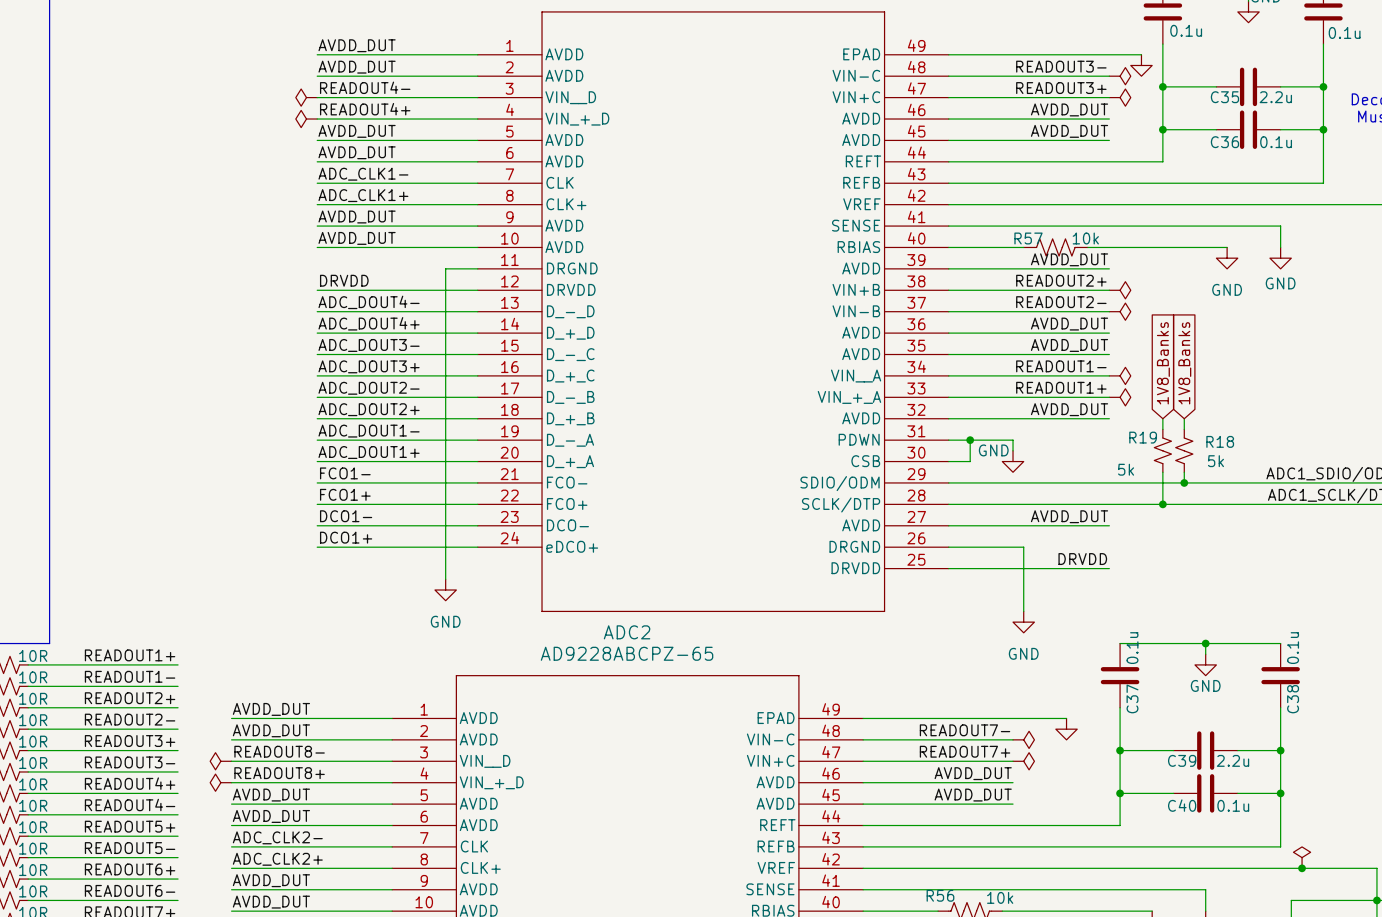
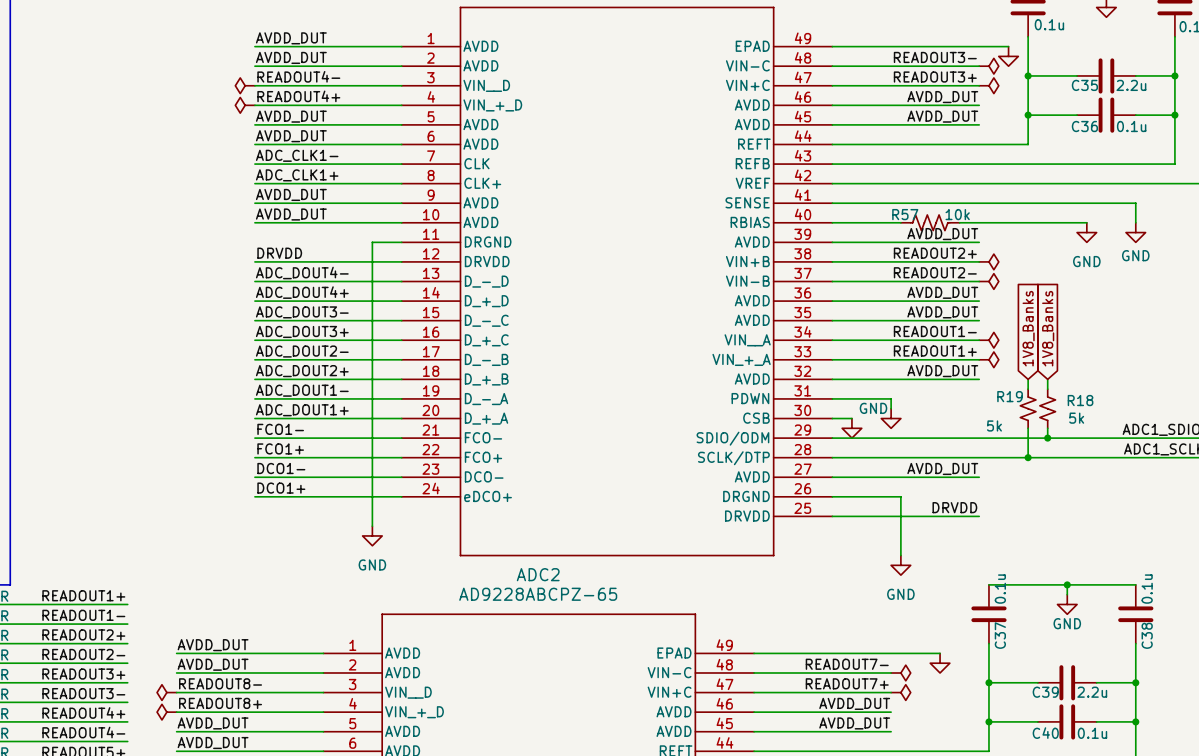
wire: (970, 440) (970, 461) -> none
junction: (970, 440) -> none
power symbol: none -> (851, 428)

